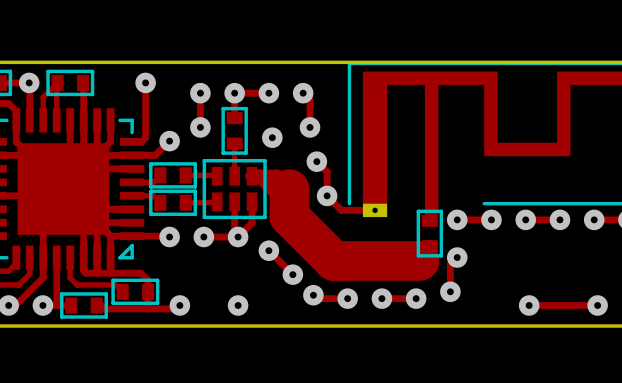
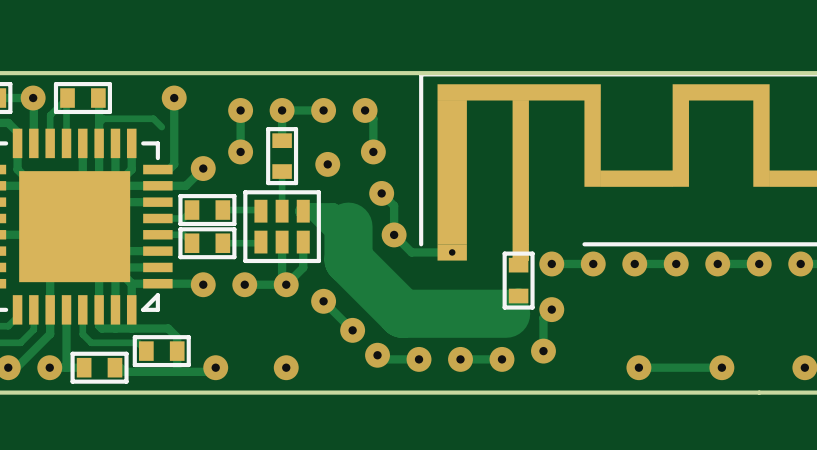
track: none -> (99, 123) (103, 118) (153, 118) (161, 127)

